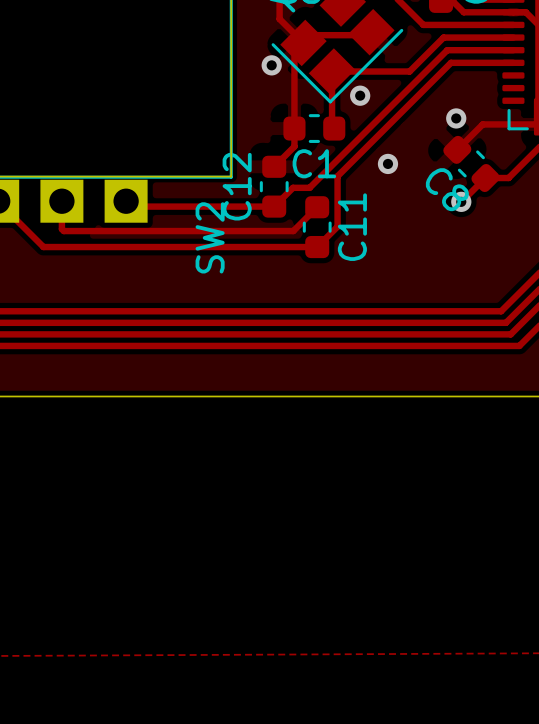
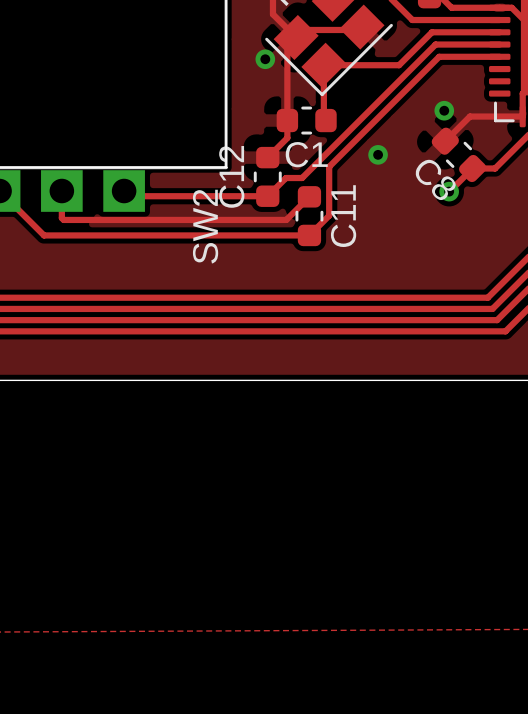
via: (360, 95) -> none

